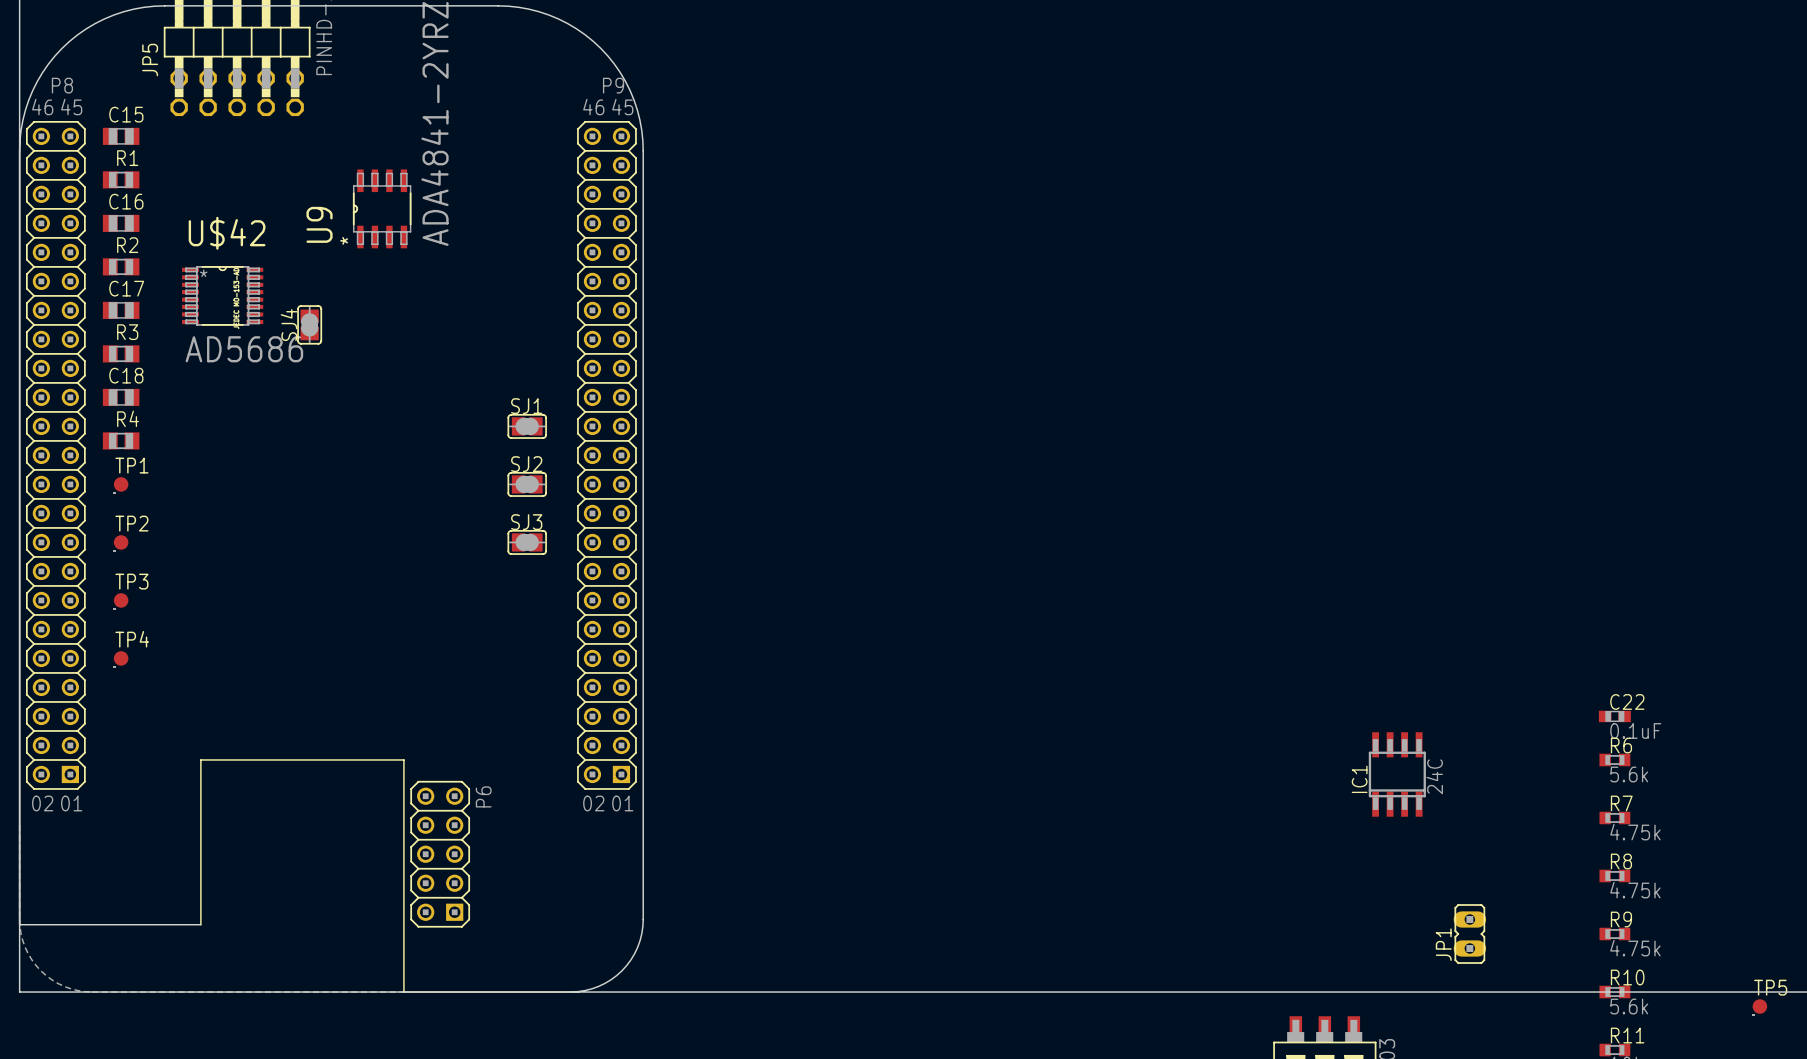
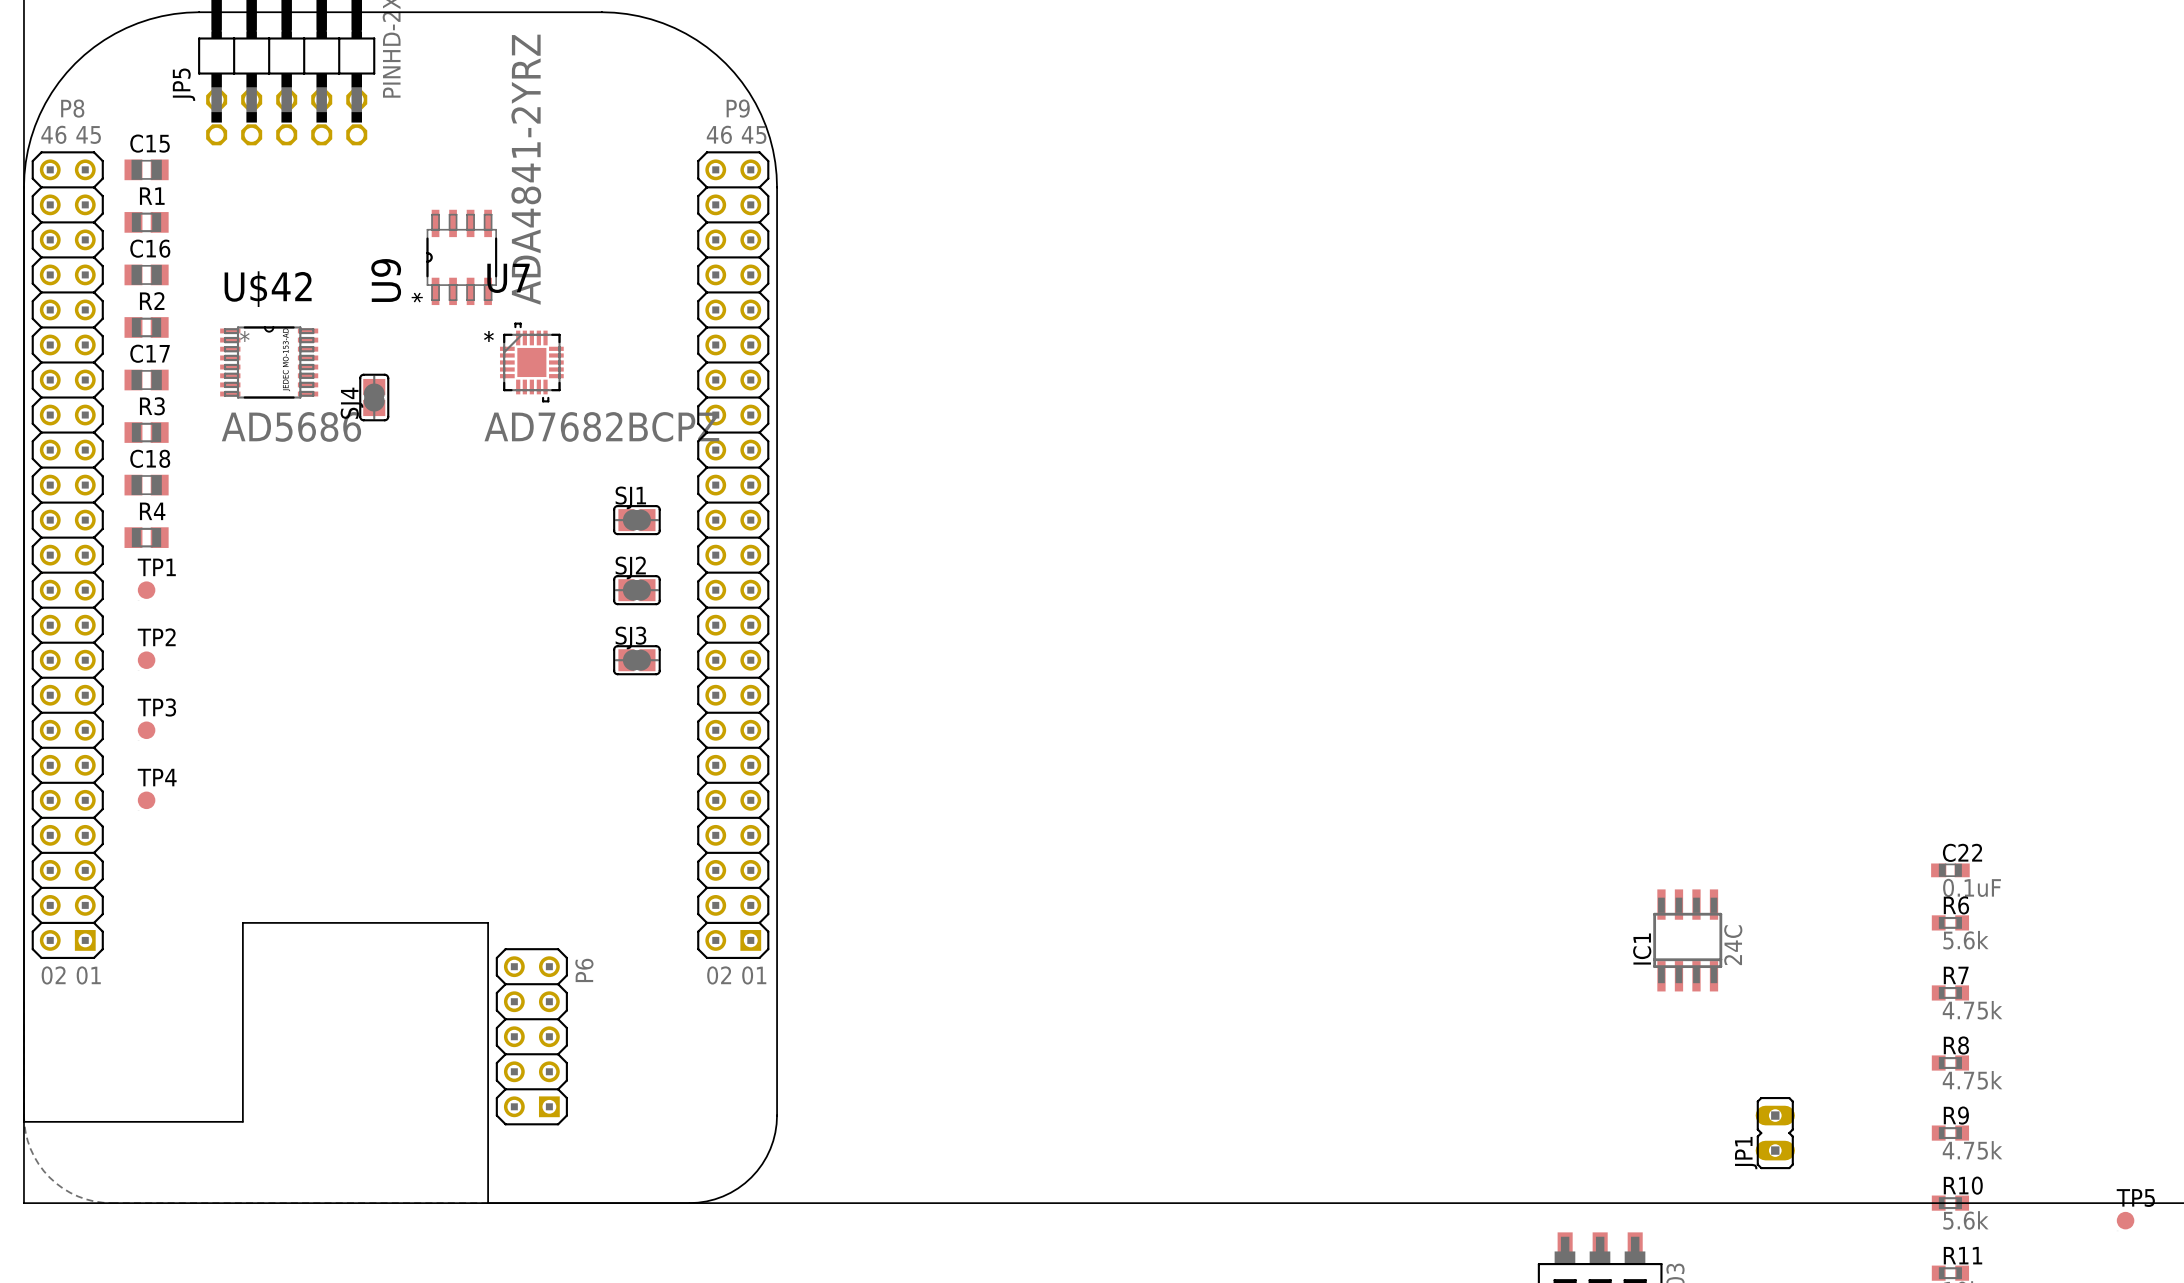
U7: none -> AD7682BCPZ (531, 362)

